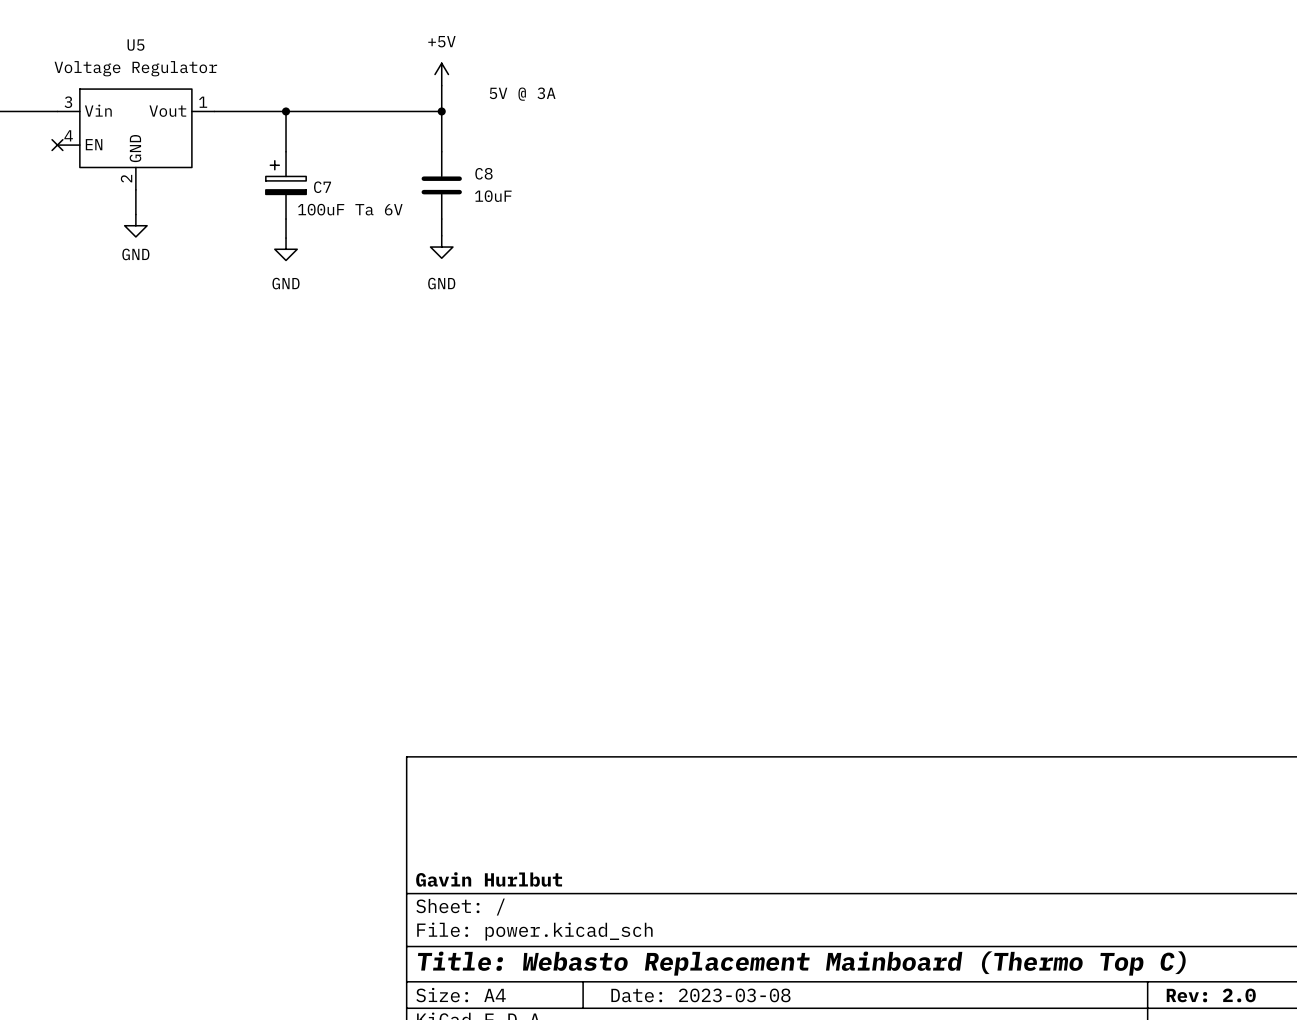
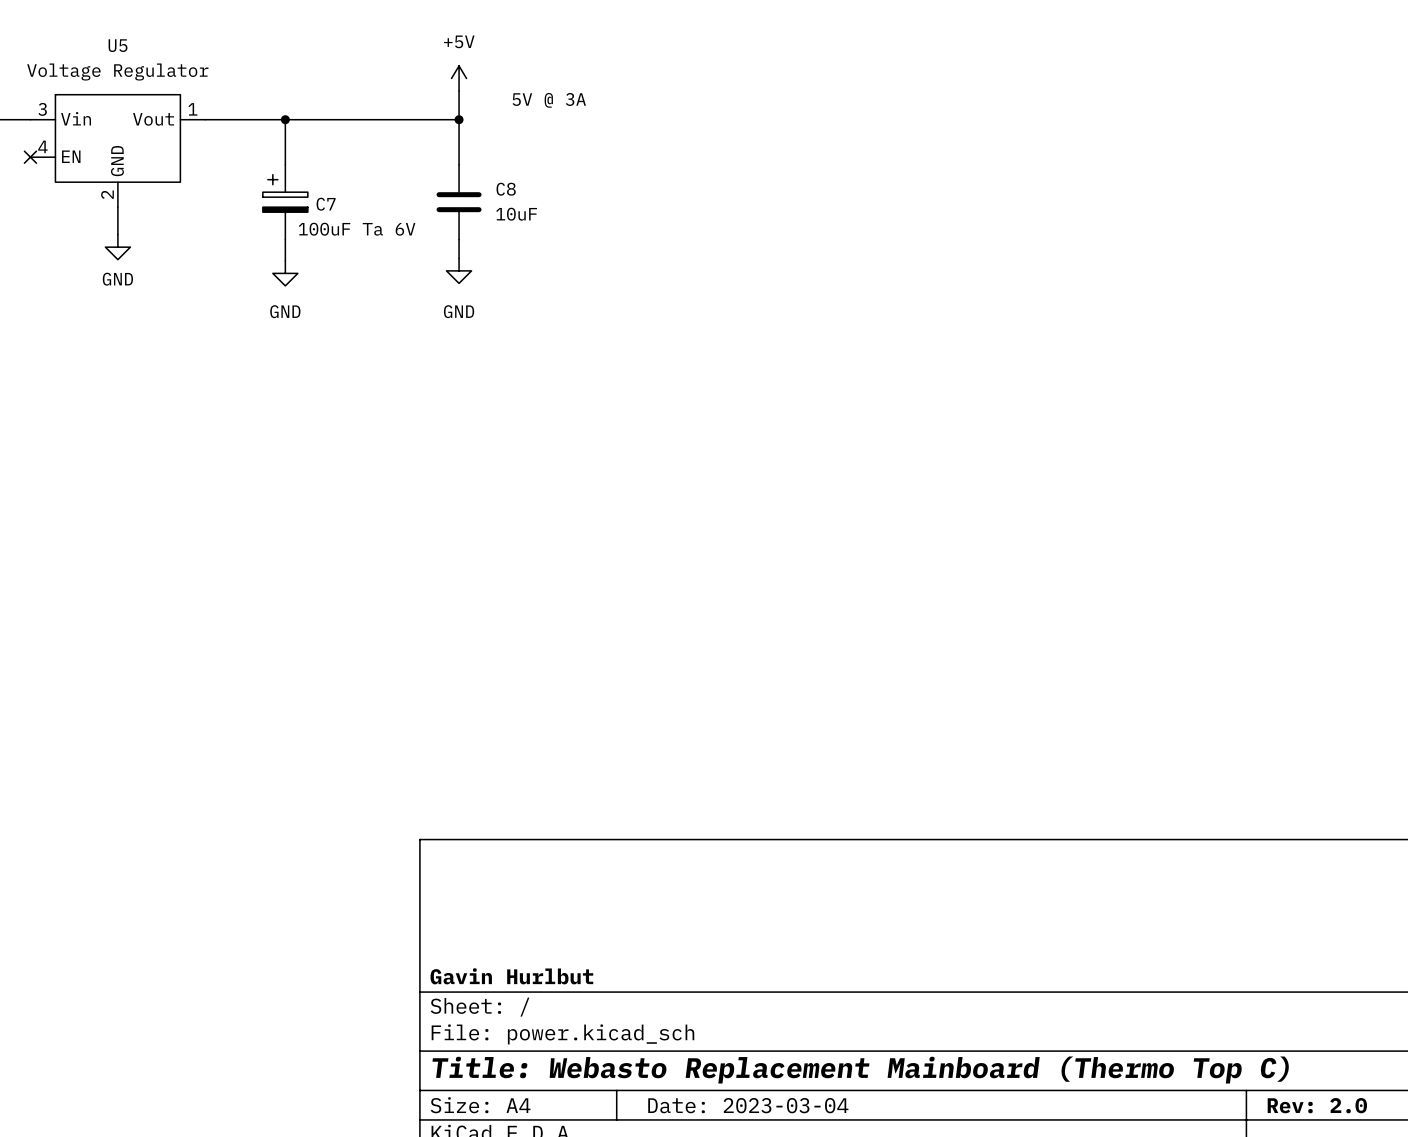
title block: Date: 2023-03-08 (700, 995) -> Date: 2023-03-04 (748, 1105)

